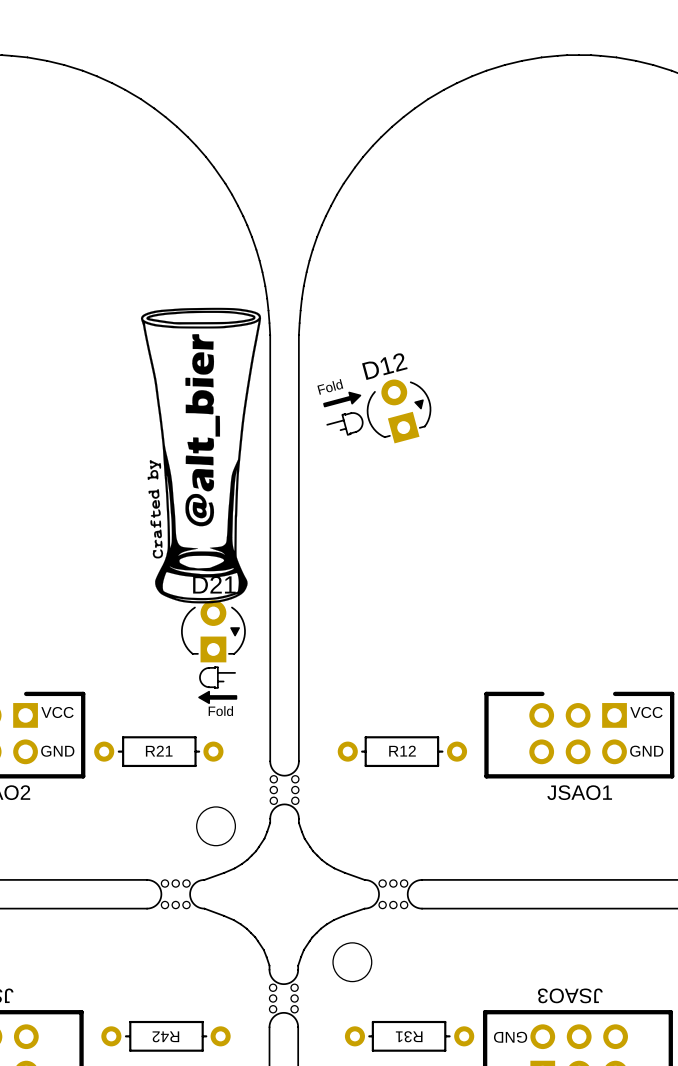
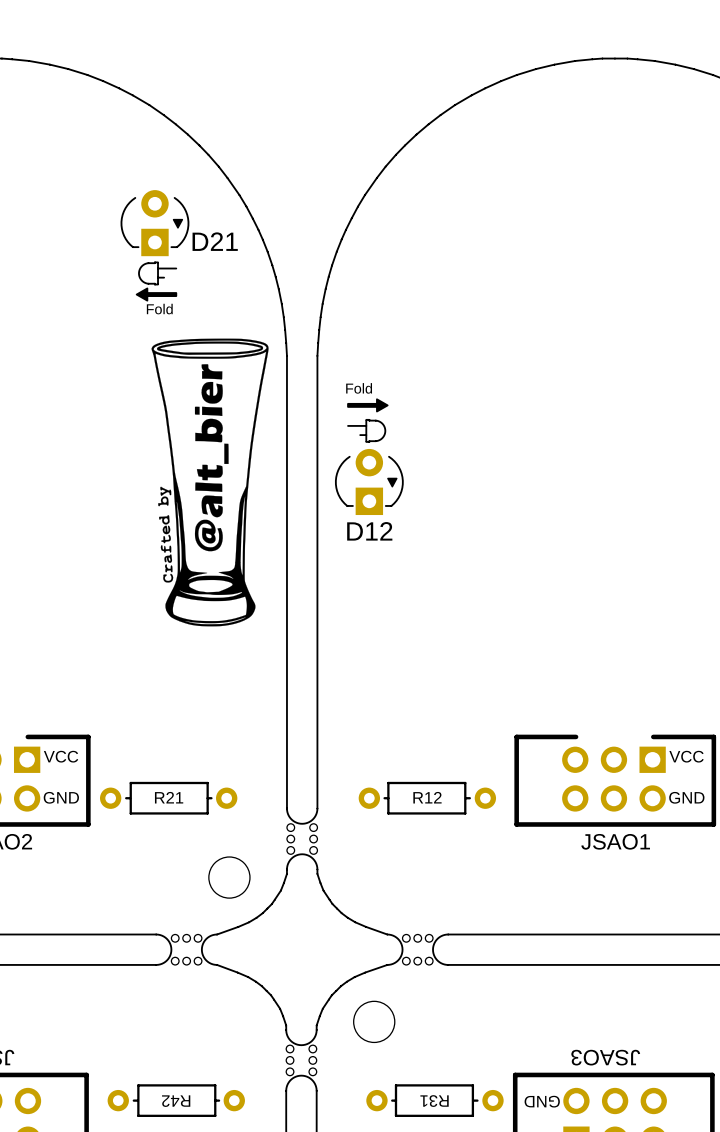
drawing: none -> [135, 261, 178, 302]
drawing shape: [140, 307, 262, 604] -> [151, 338, 269, 627]
D12 name position: D12 (384, 366) -> D12 (369, 531)
drawing: none -> [347, 398, 389, 413]
drawing shape: [317, 379, 362, 408] -> [347, 418, 387, 443]
D12 rotation: 0° (399, 411) -> 15° clockwise (369, 481)
D12 position: (399, 411) -> (369, 481)
drawing: [326, 412, 364, 436] -> none
D21 name position: D21 (214, 584) -> D21 (215, 241)
D21 position: (213, 631) -> (154, 223)
drawing: [198, 666, 238, 705] -> none

